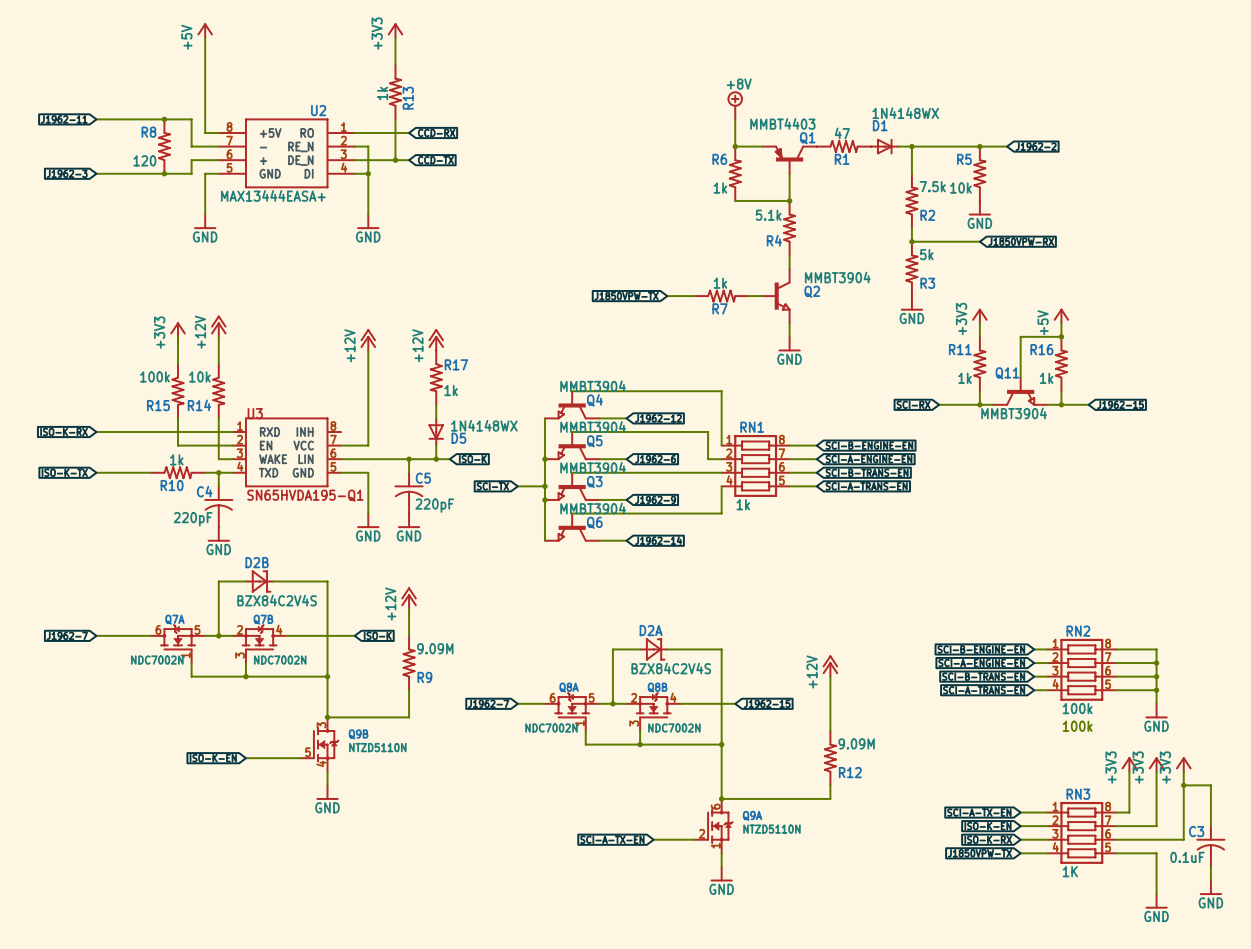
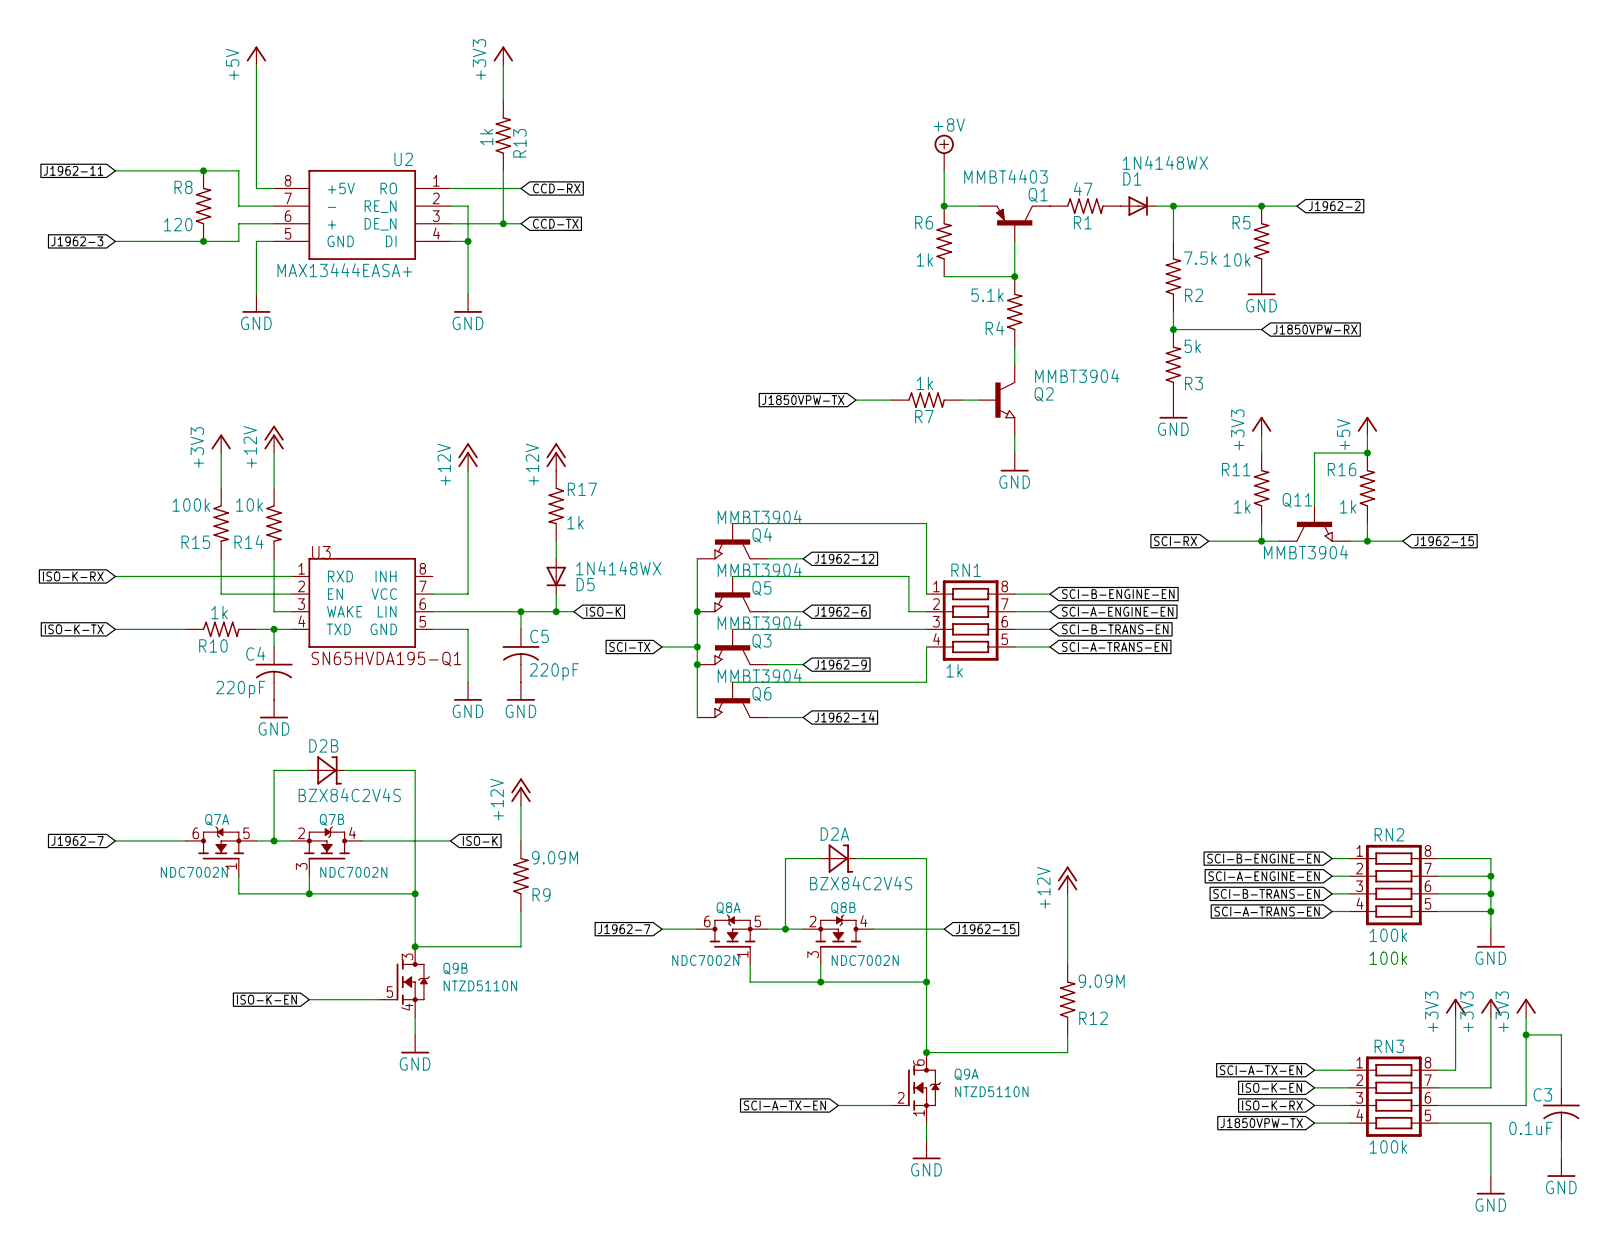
RN3 value: 1K (1070, 871) -> 100k (1388, 1146)

